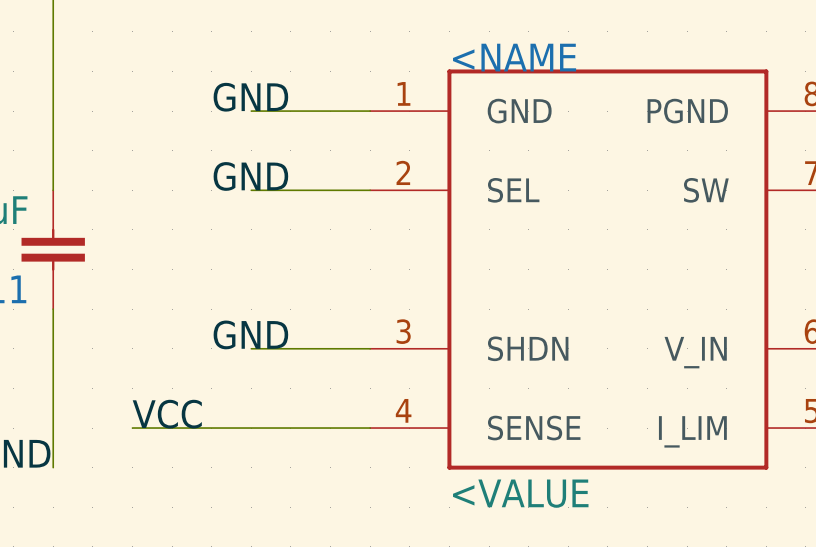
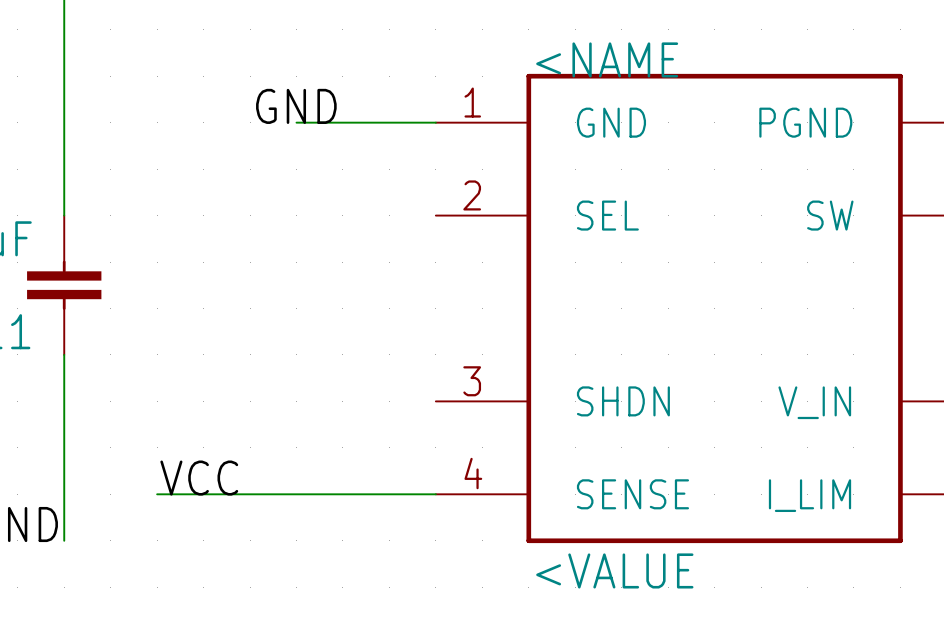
label: GND (250, 176) -> none
wire: (251, 190) (370, 190) -> none
label: GND (250, 334) -> none
wire: (251, 348) (370, 348) -> none

